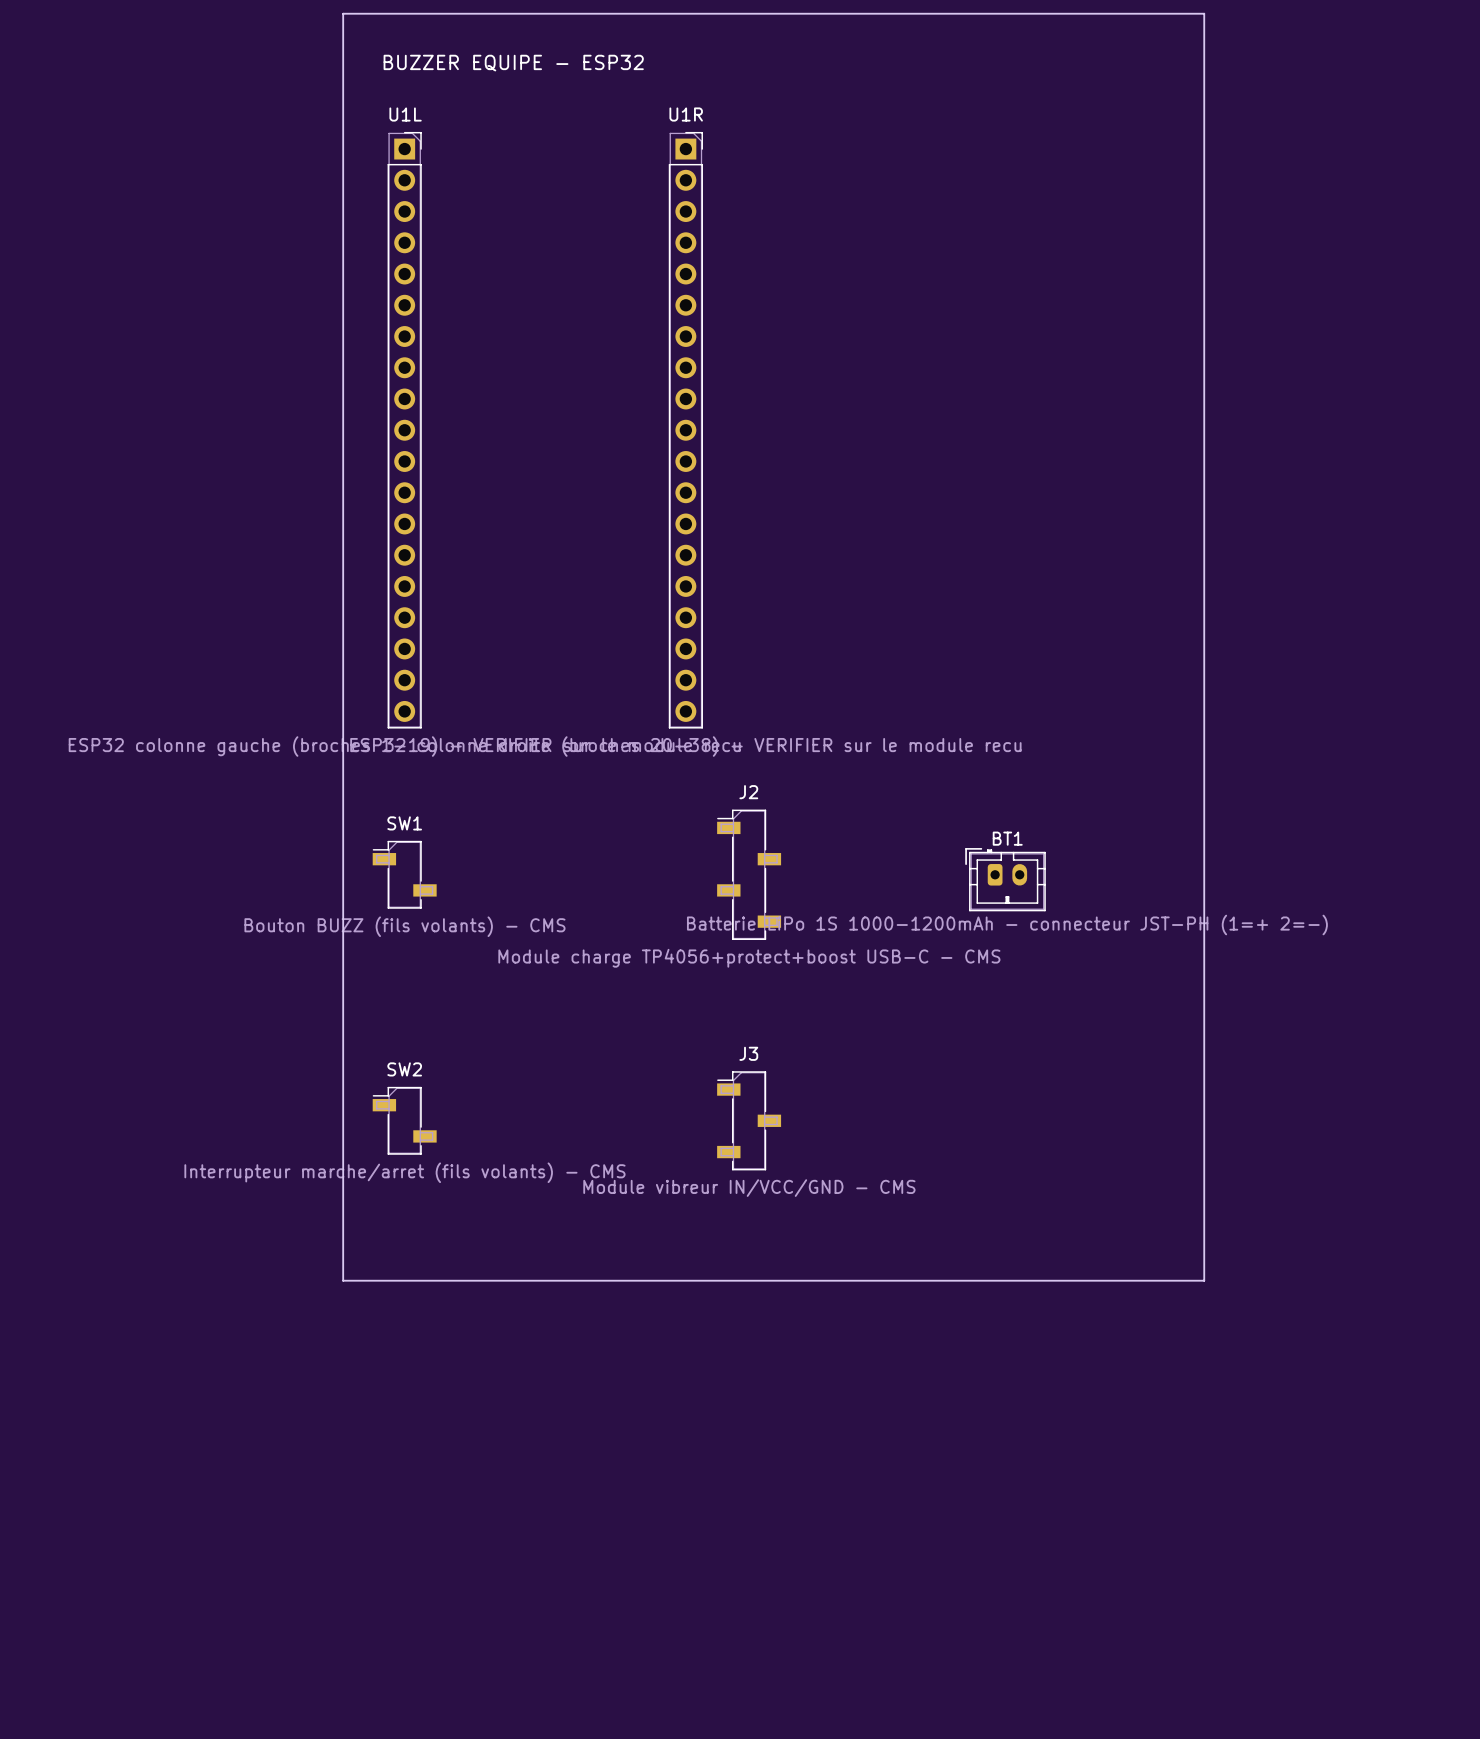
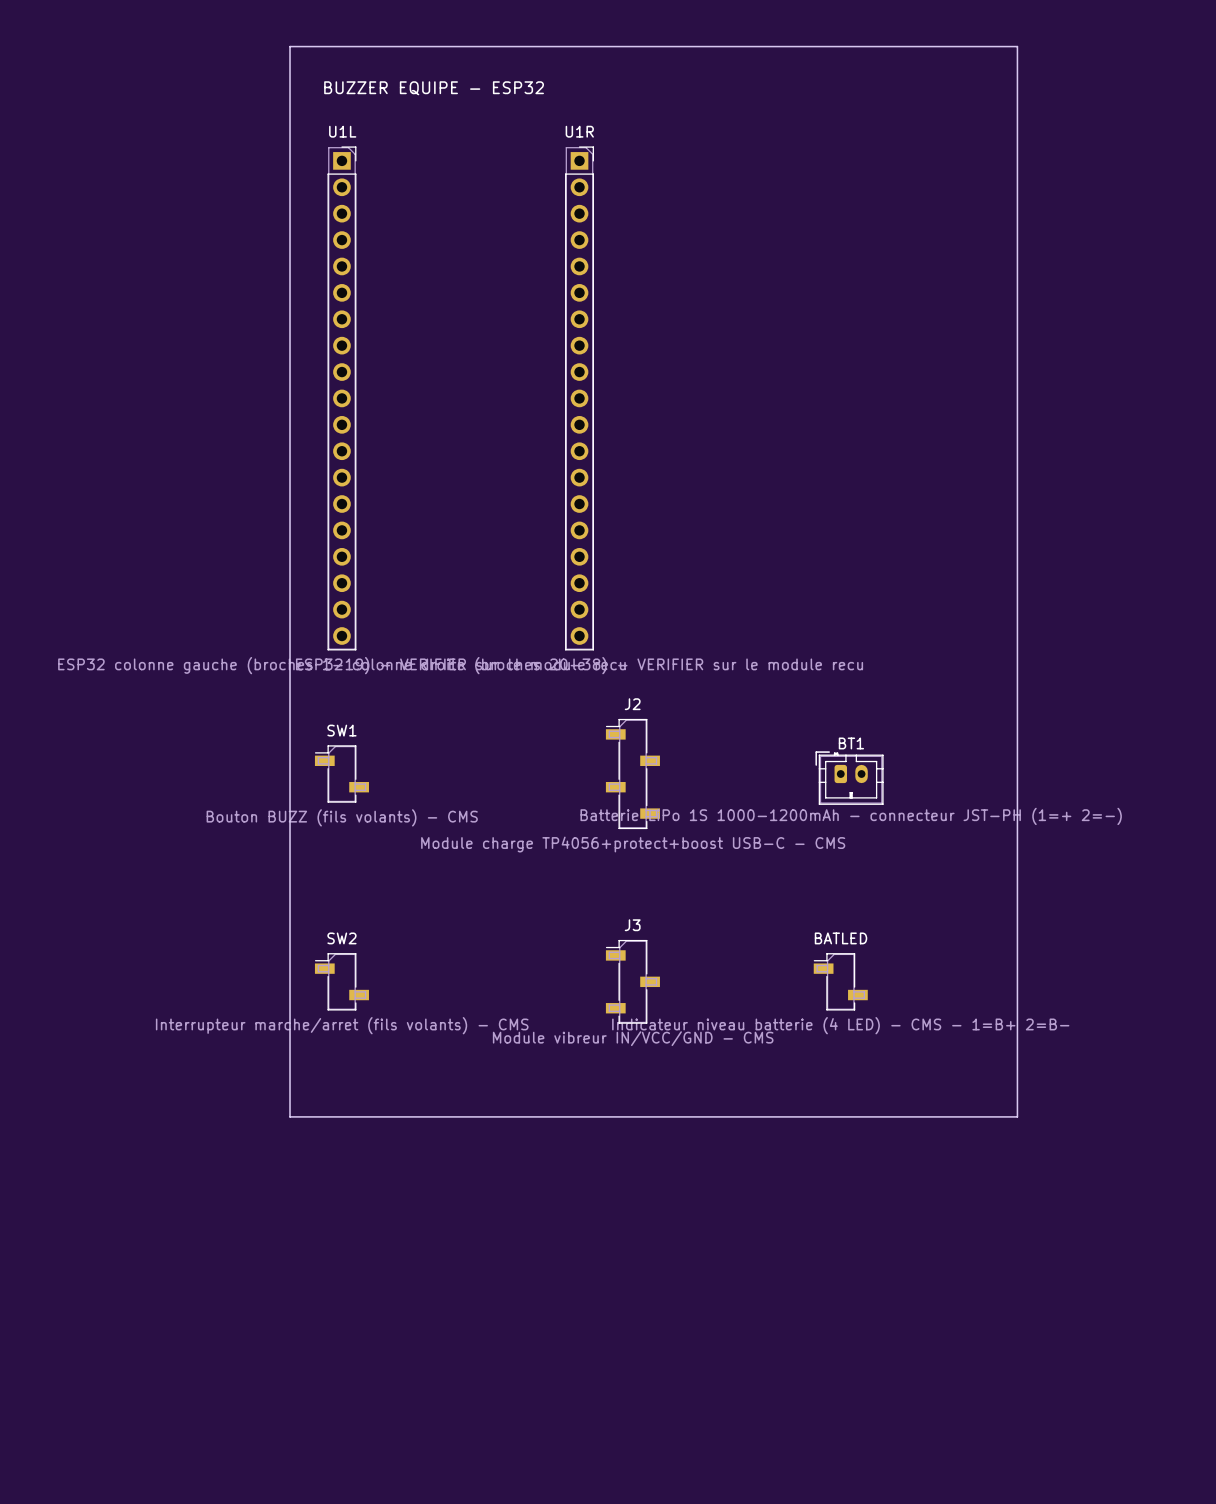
BATLED: none -> Indicateur niveau batterie (4 LED) - CMS - 1=B+ 2=B- (840, 981)

